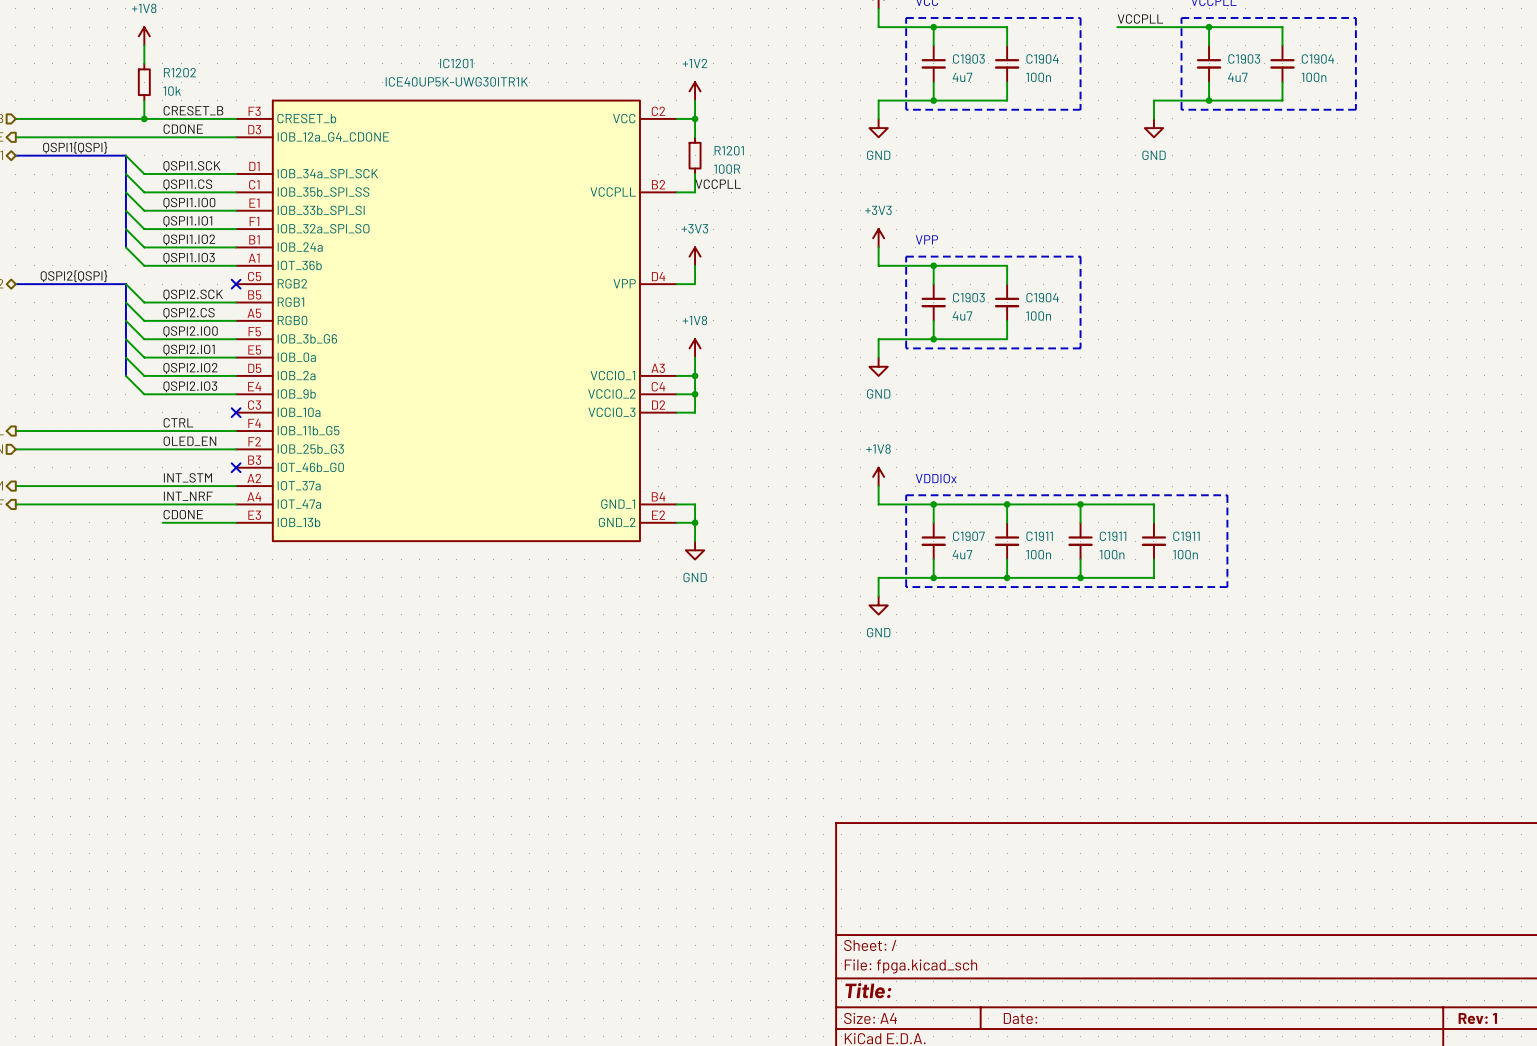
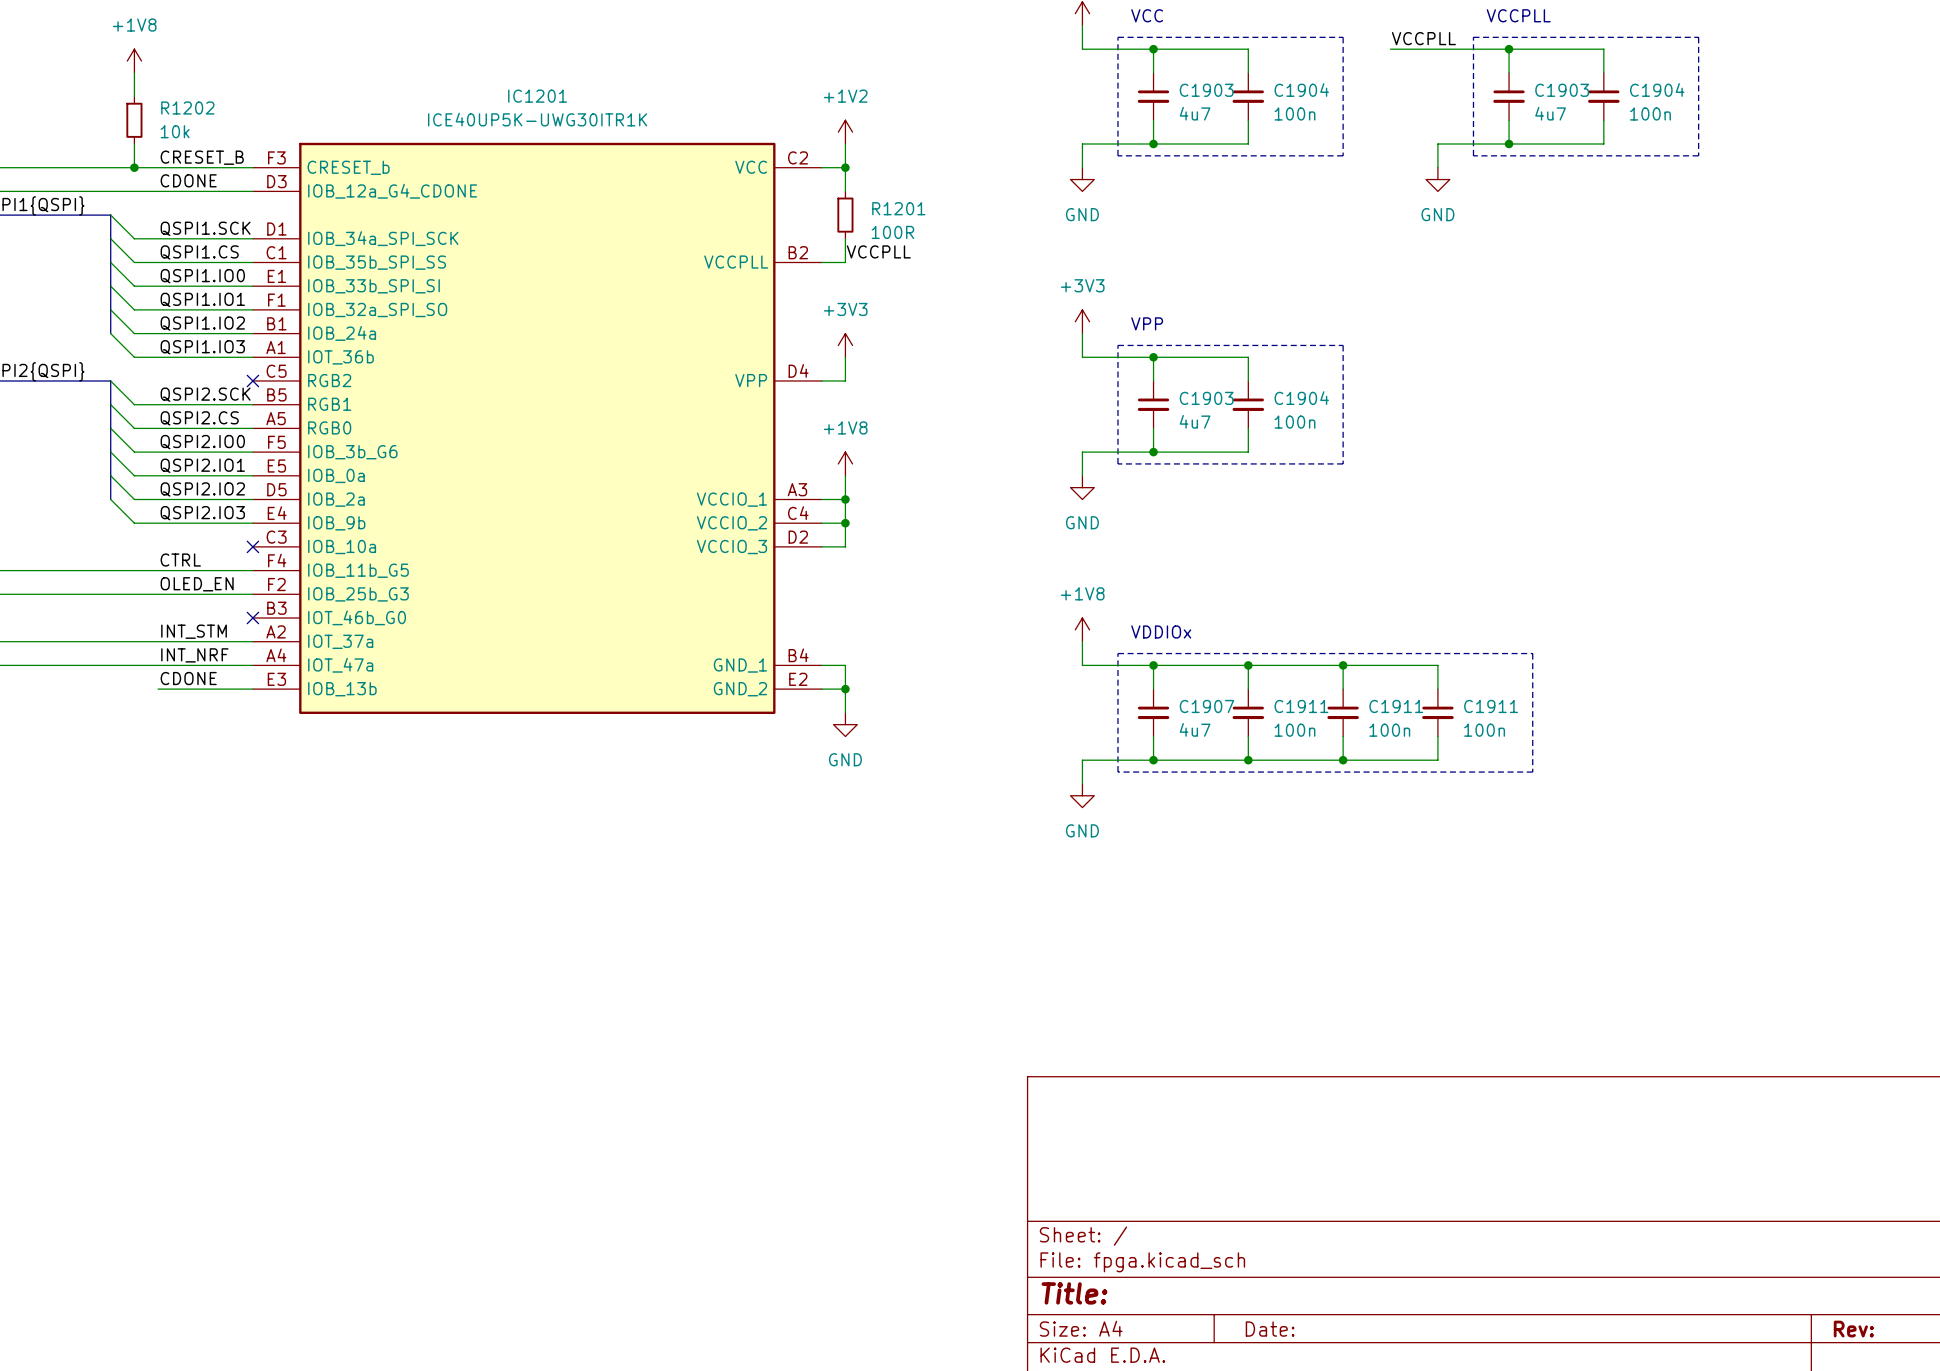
title block: Rev: 1 (1477, 1018) -> Rev: (1853, 1329)

